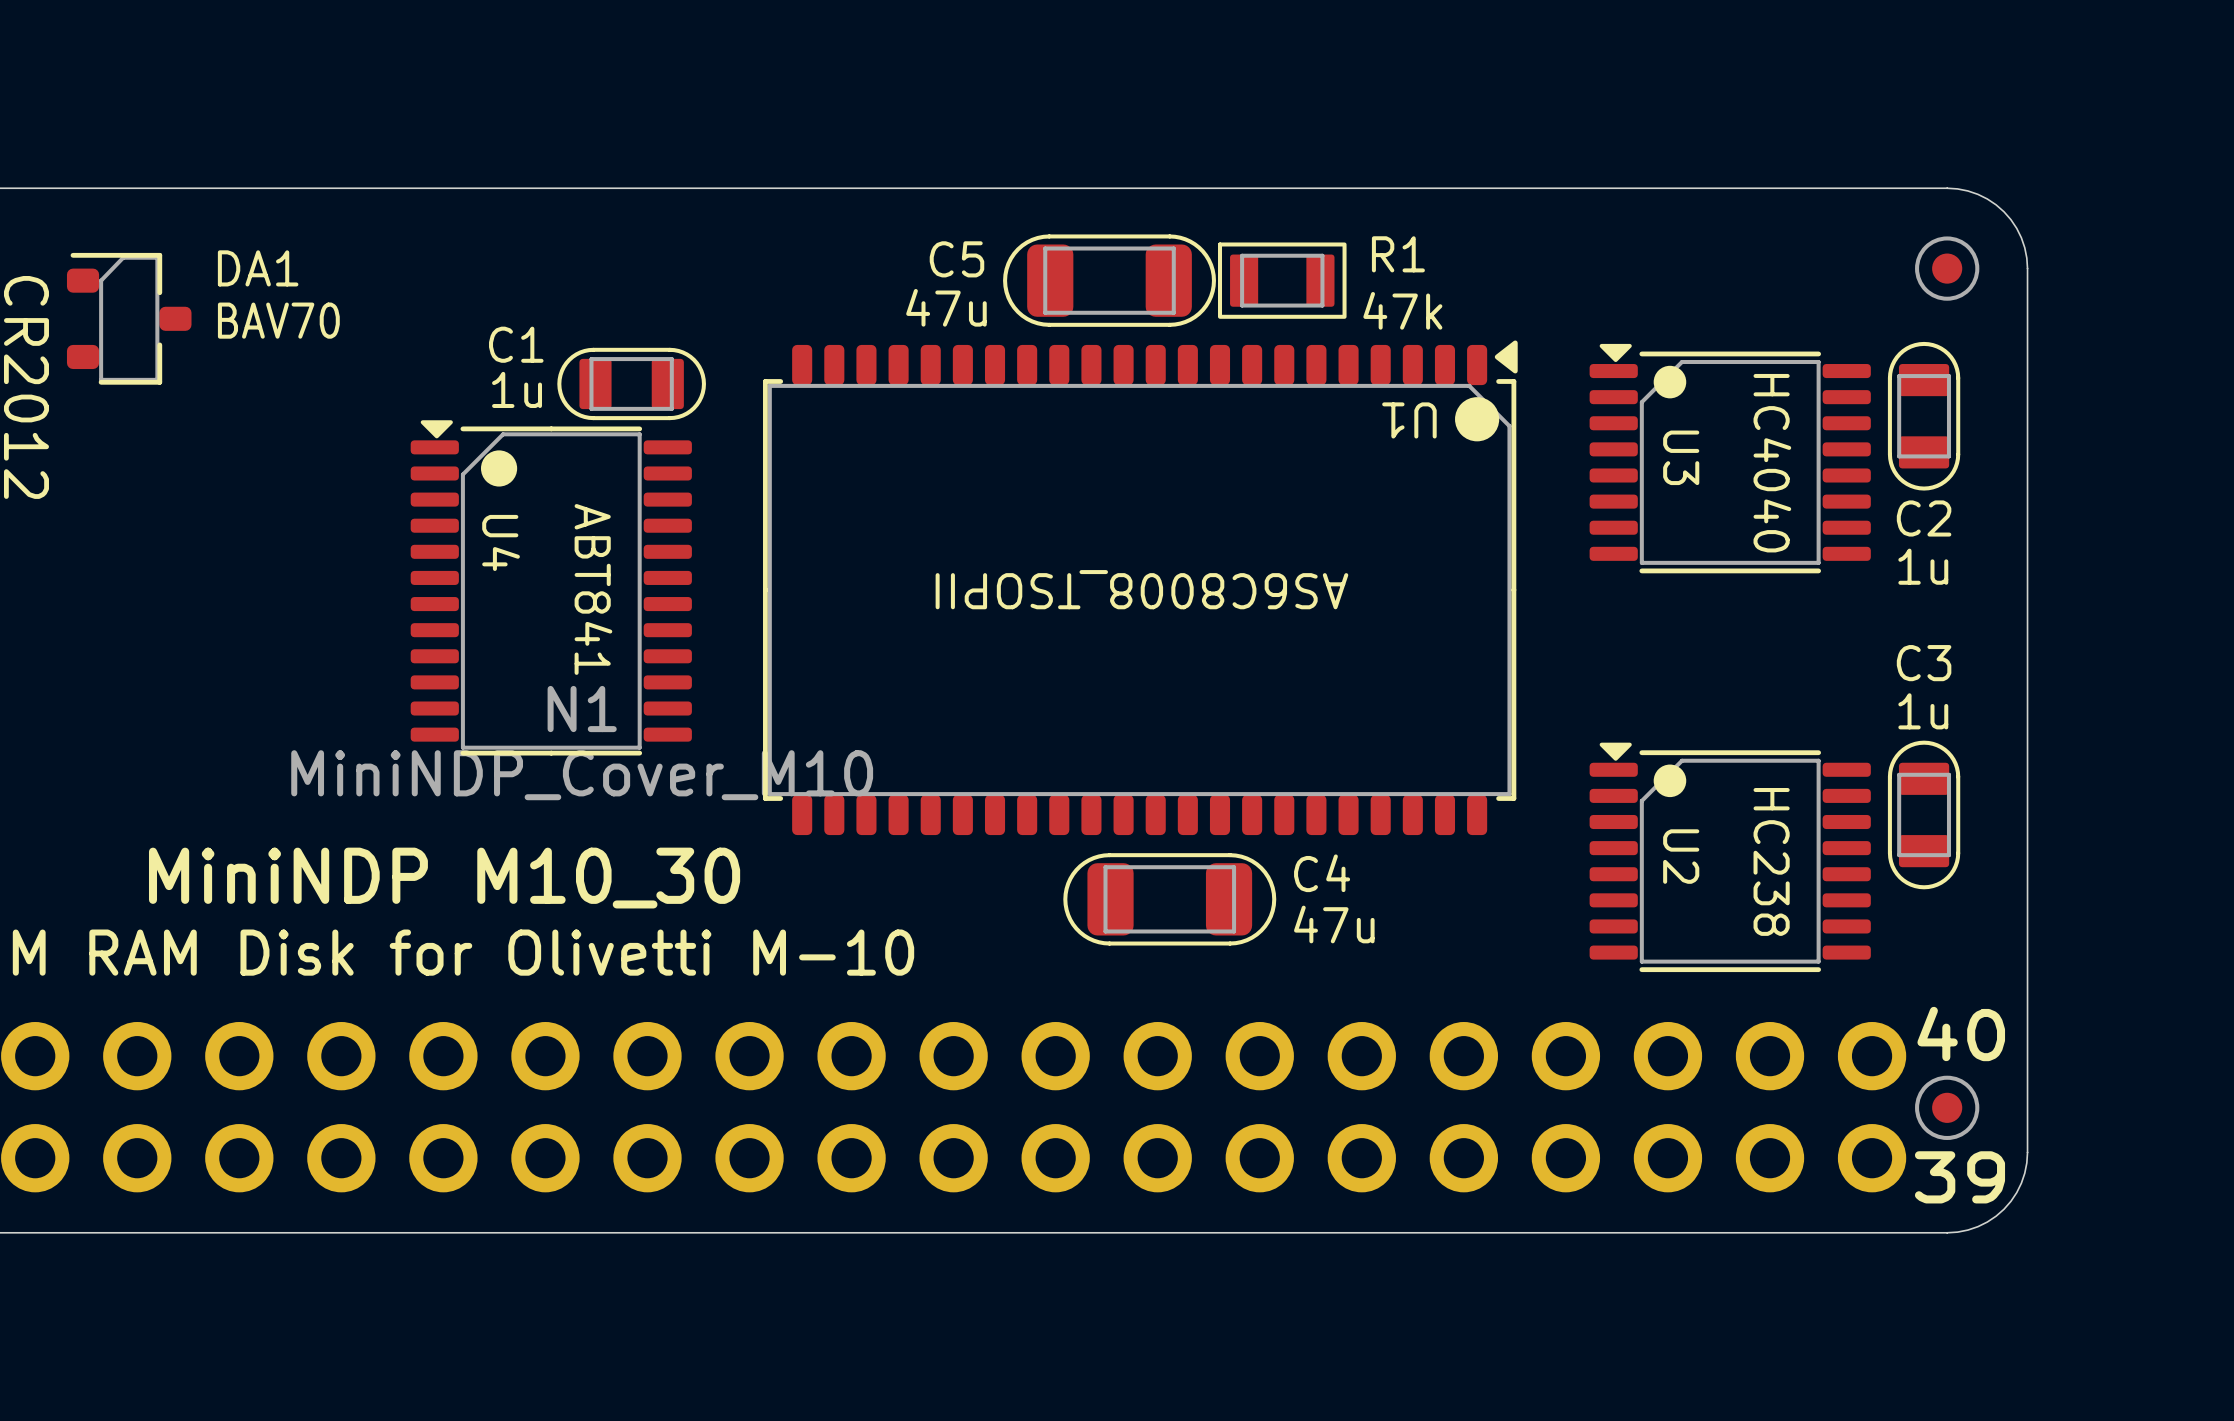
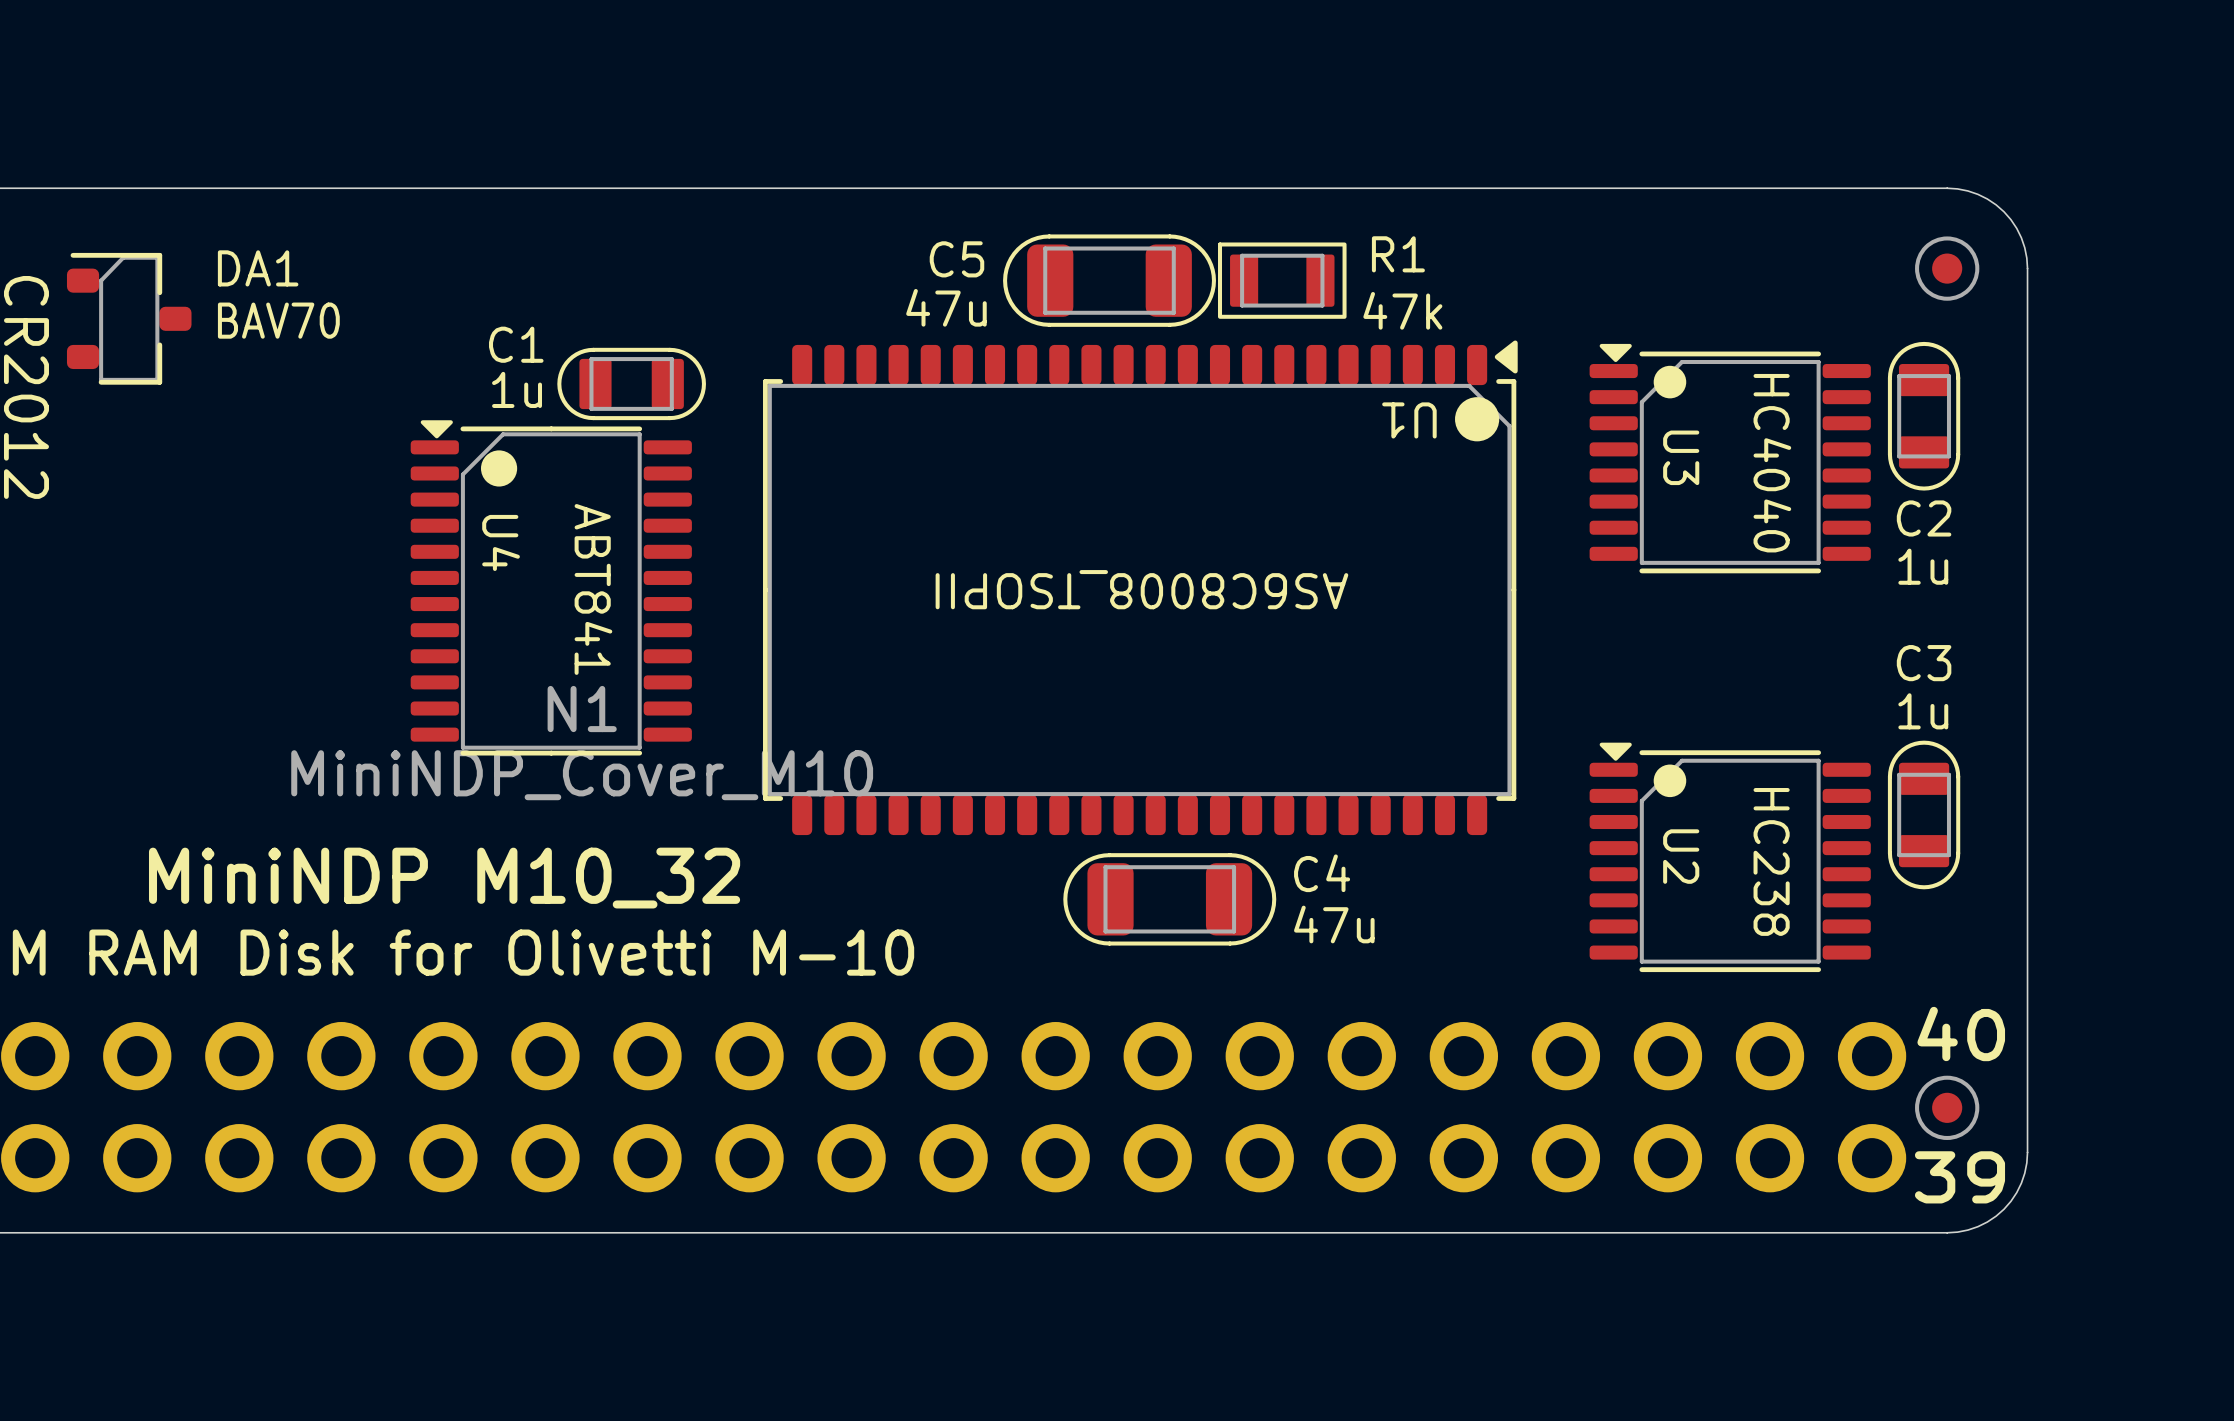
text: MiniNDP M10_30 (444, 878) -> MiniNDP M10_32 (444, 878)

